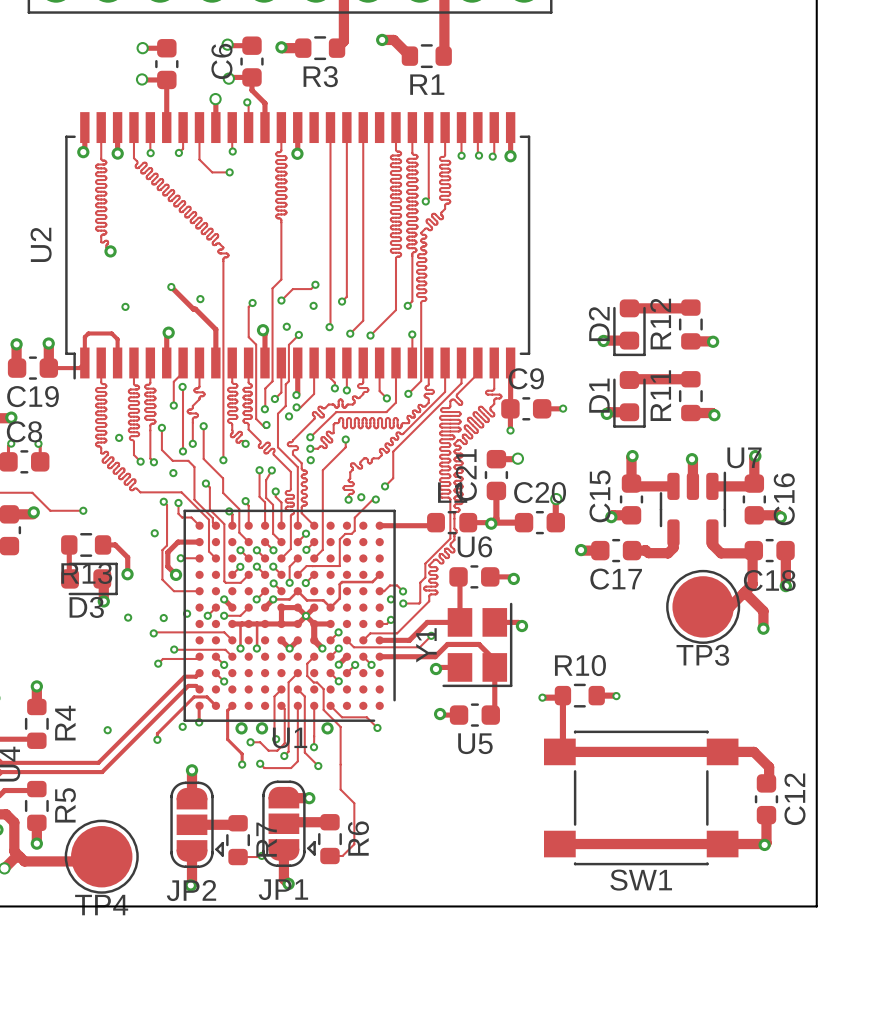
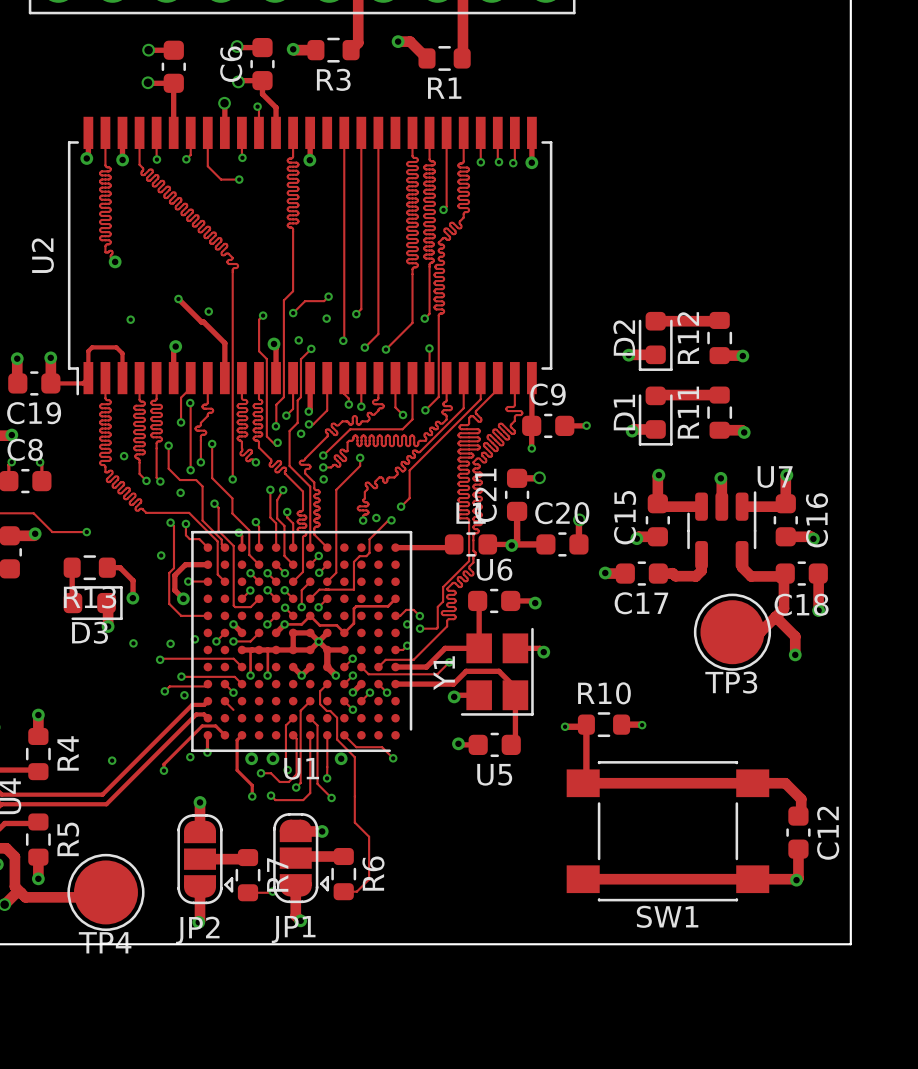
via position: (224, 681) -> (184, 695)

